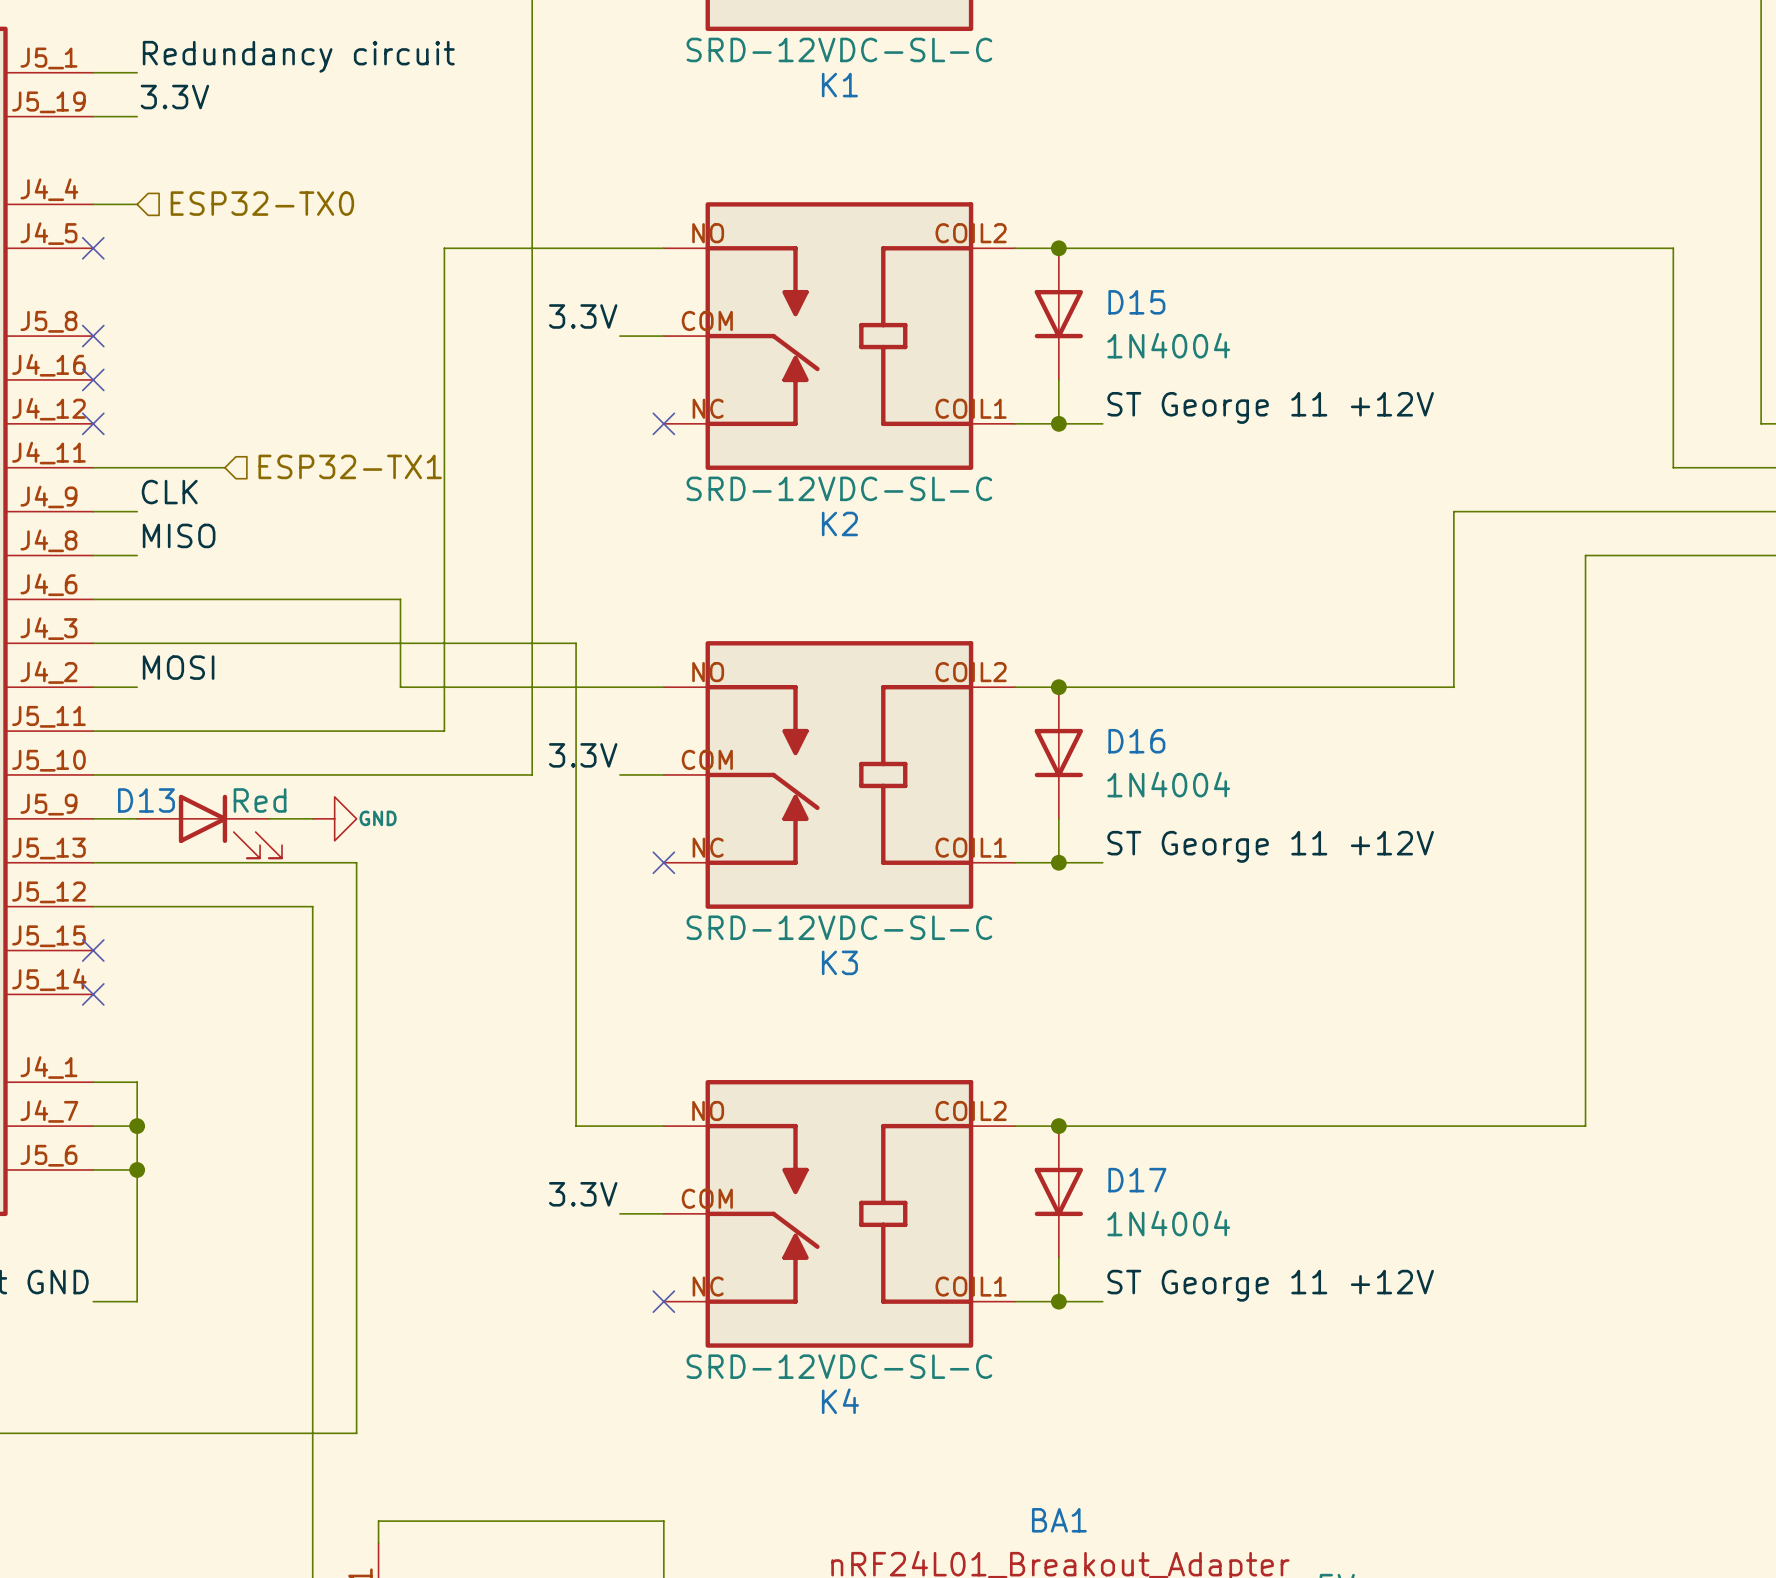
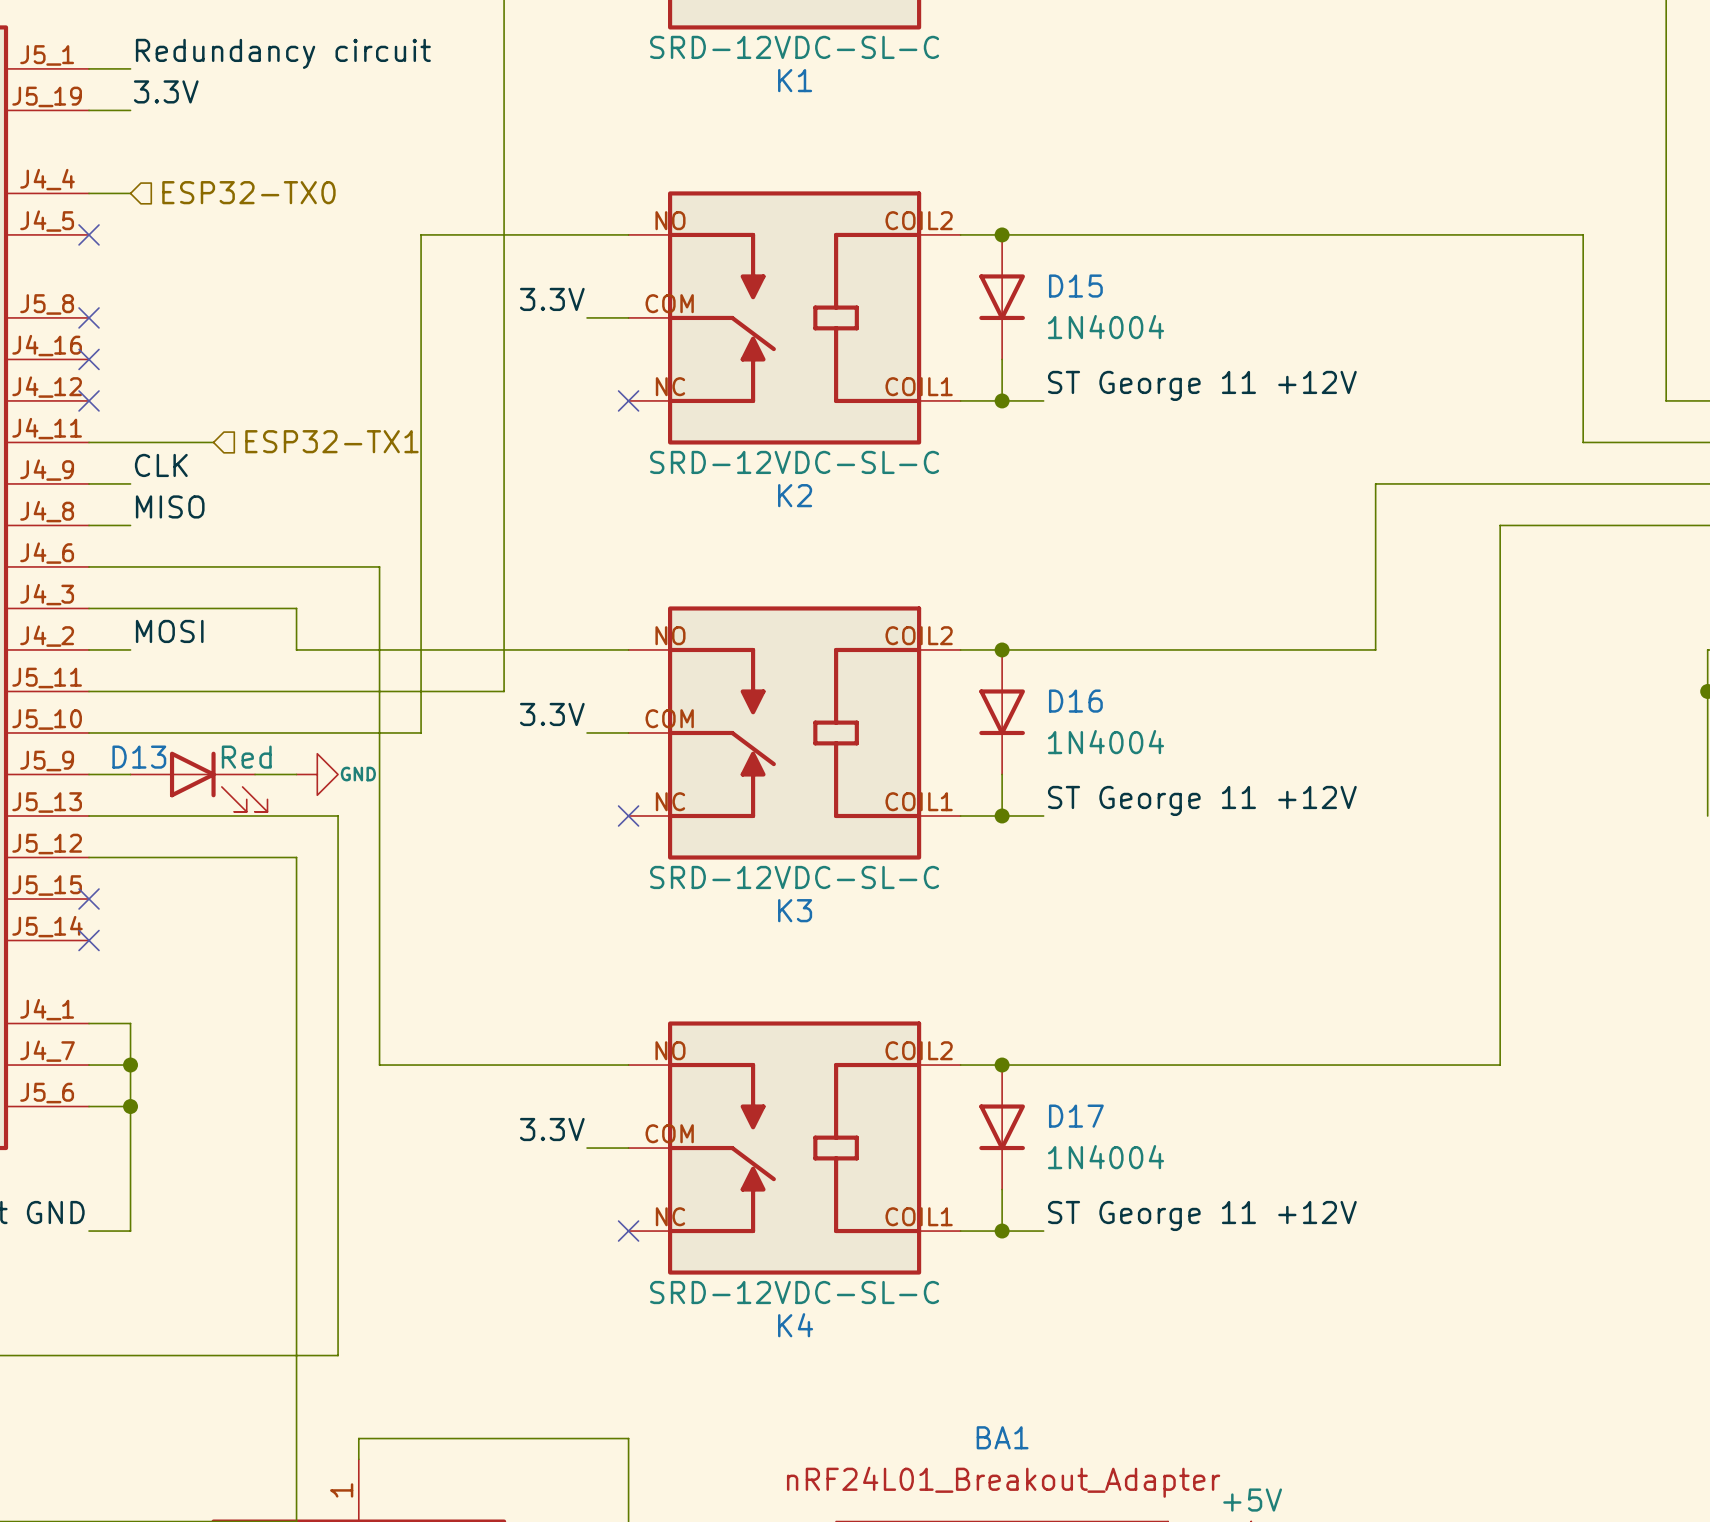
wire: (312, 643) (576, 643) (576, 1126) -> (296, 608) (296, 649) (379, 649) (379, 1065) (545, 1065)
wire: (532, 731) (532, 774) (444, 774) -> (504, 691) (421, 691) (421, 732)

